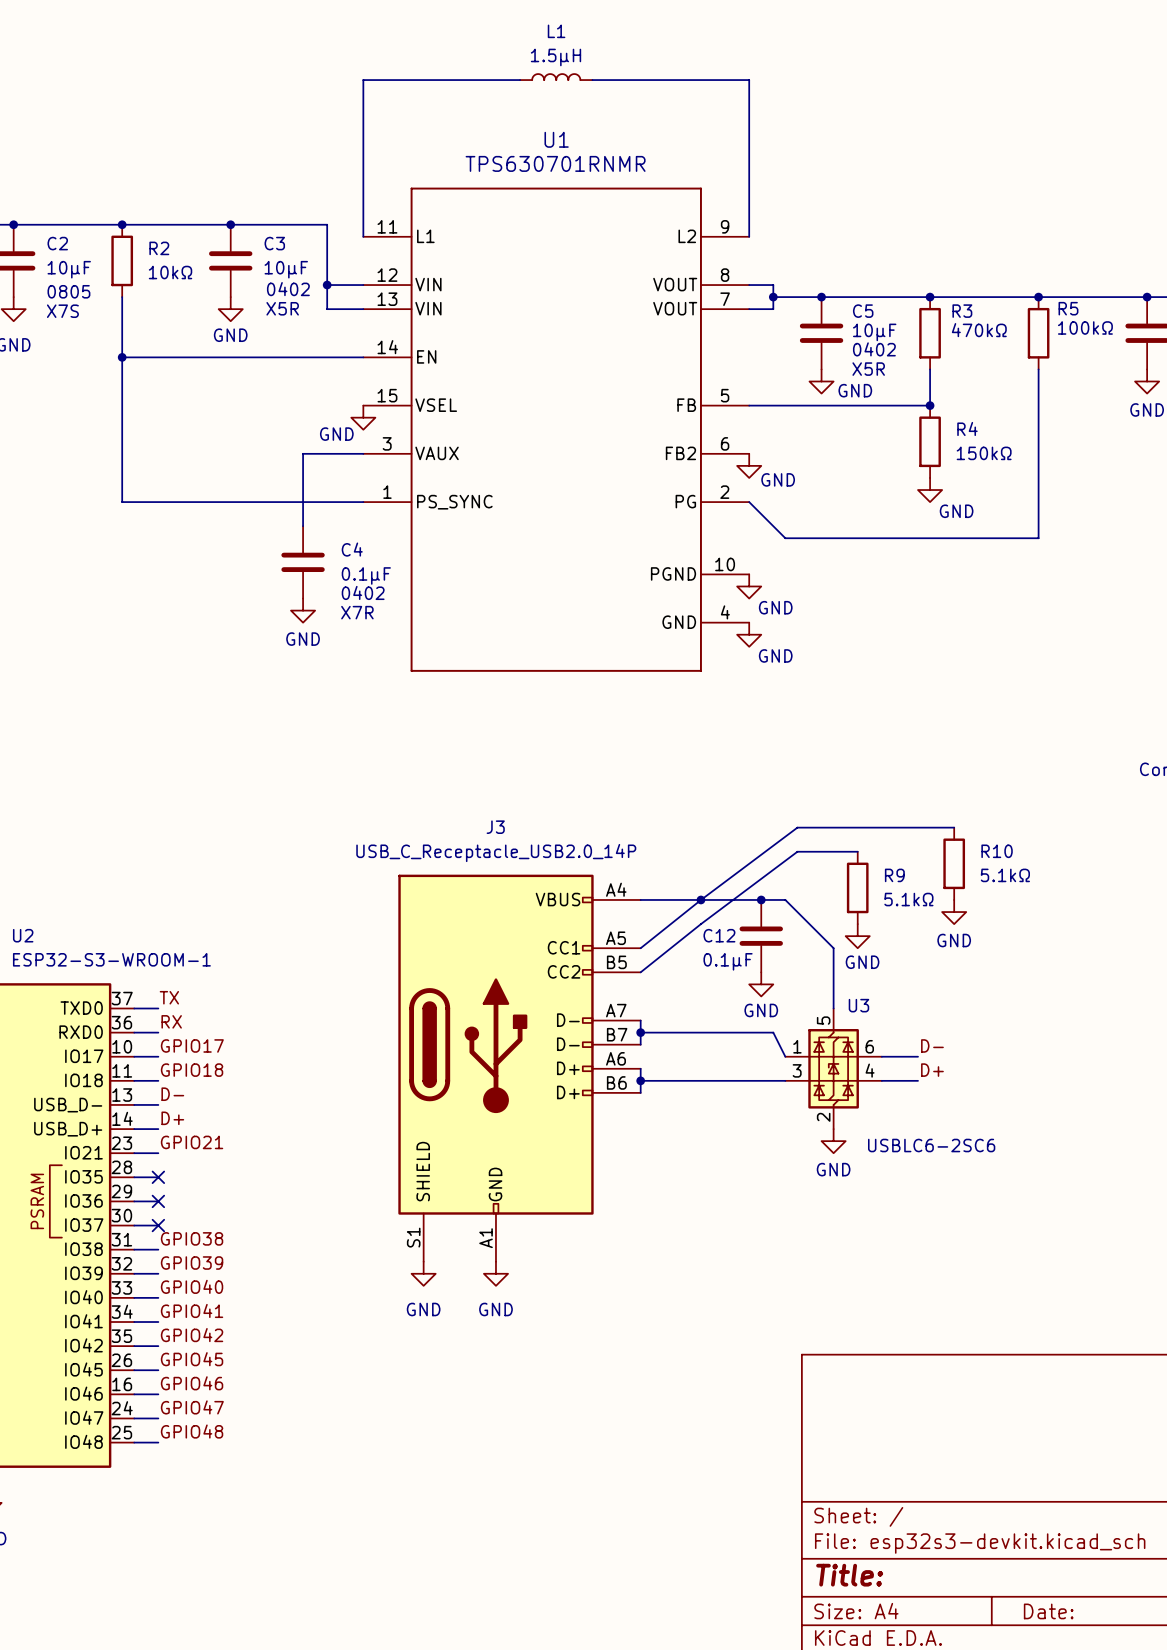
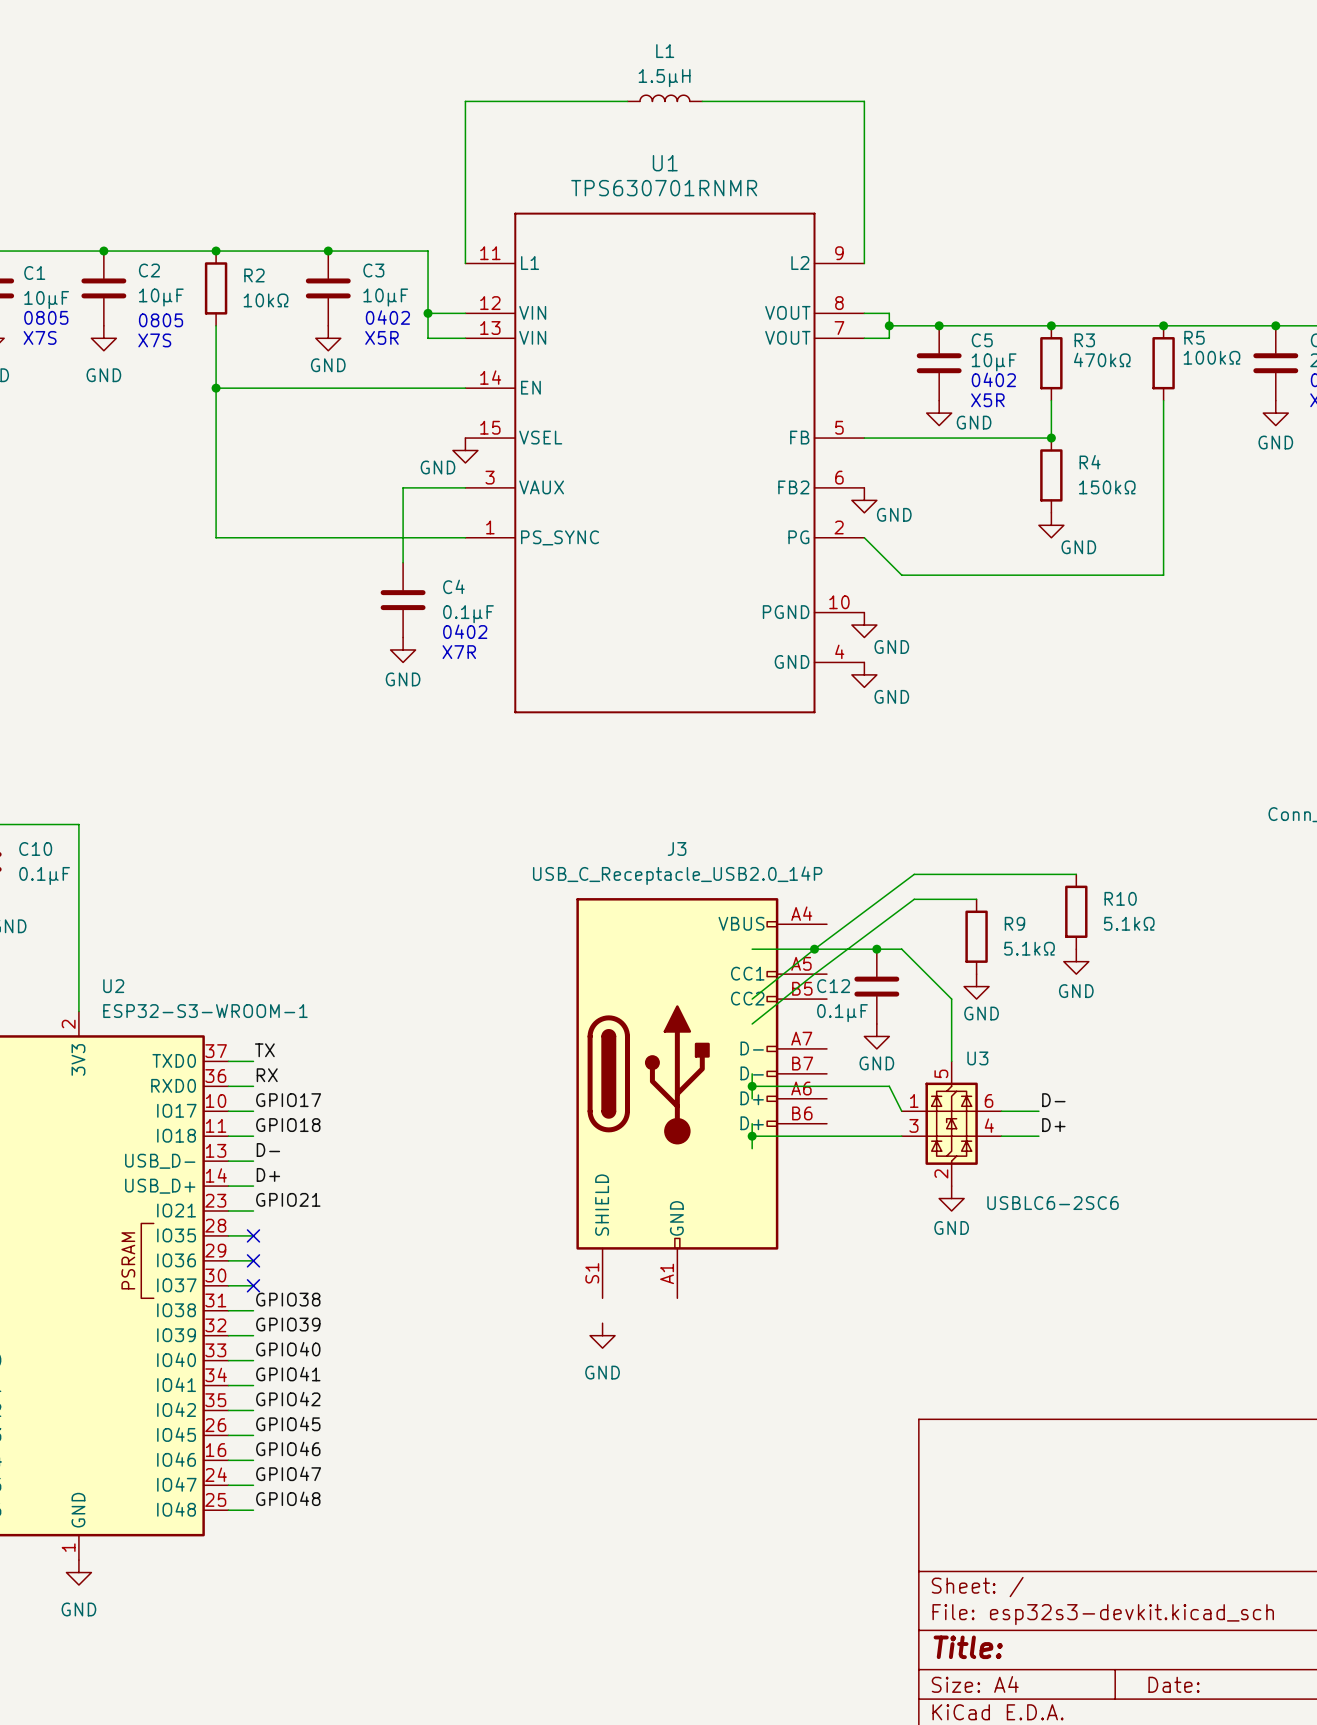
J3 position: (519, 1068) -> (701, 1098)
power symbol: GND (423, 1273) -> none

